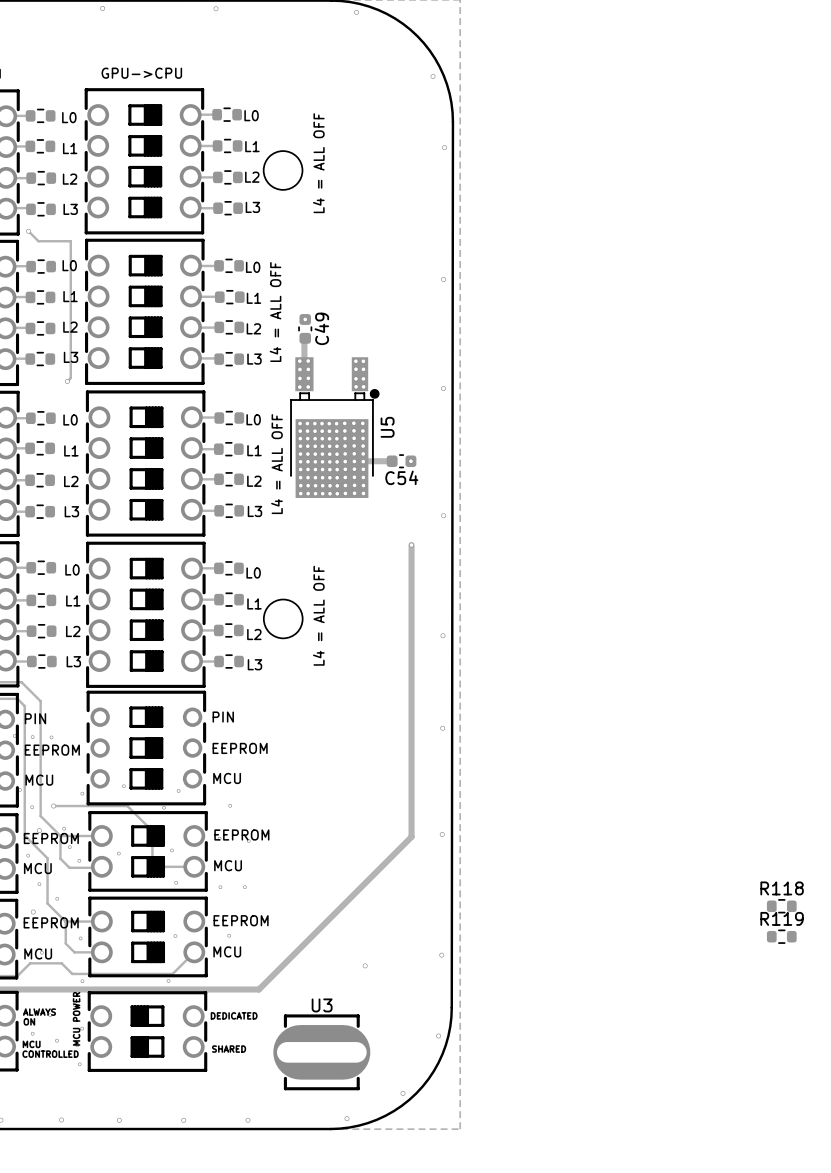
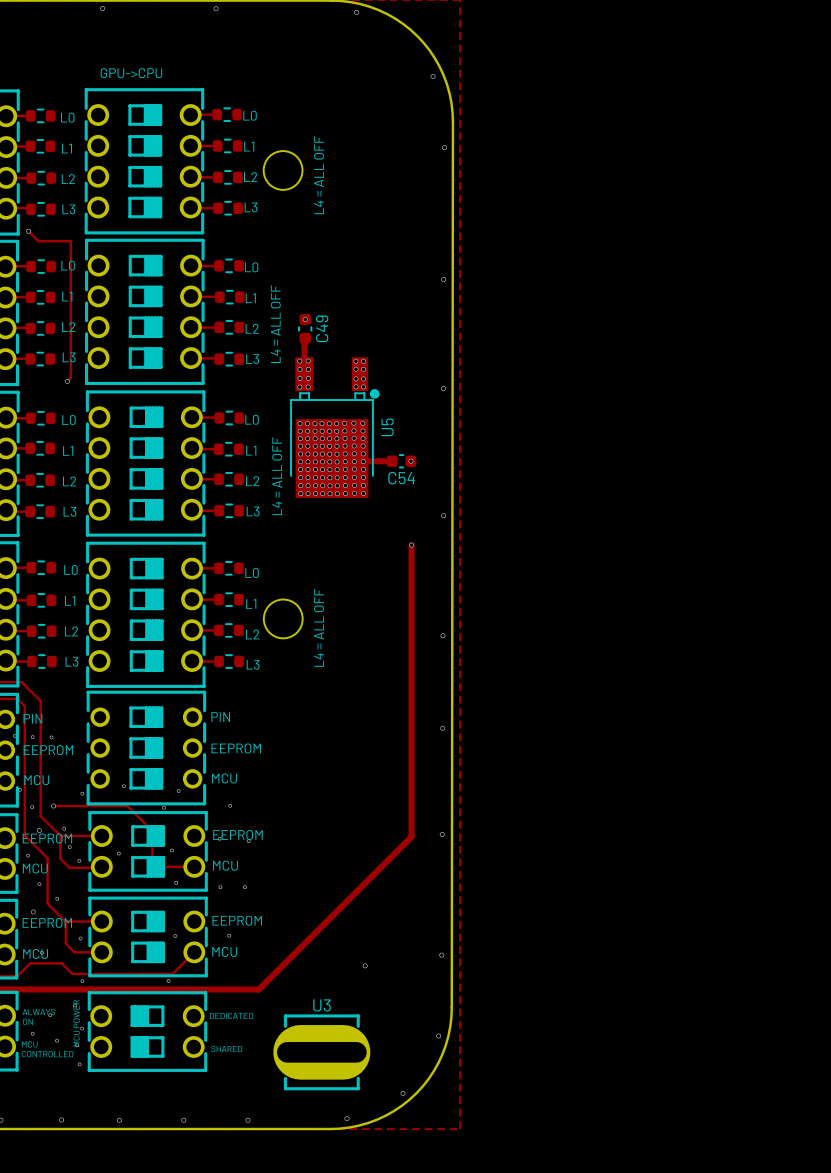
R118: (781, 906) -> none
R119: (781, 936) -> none

